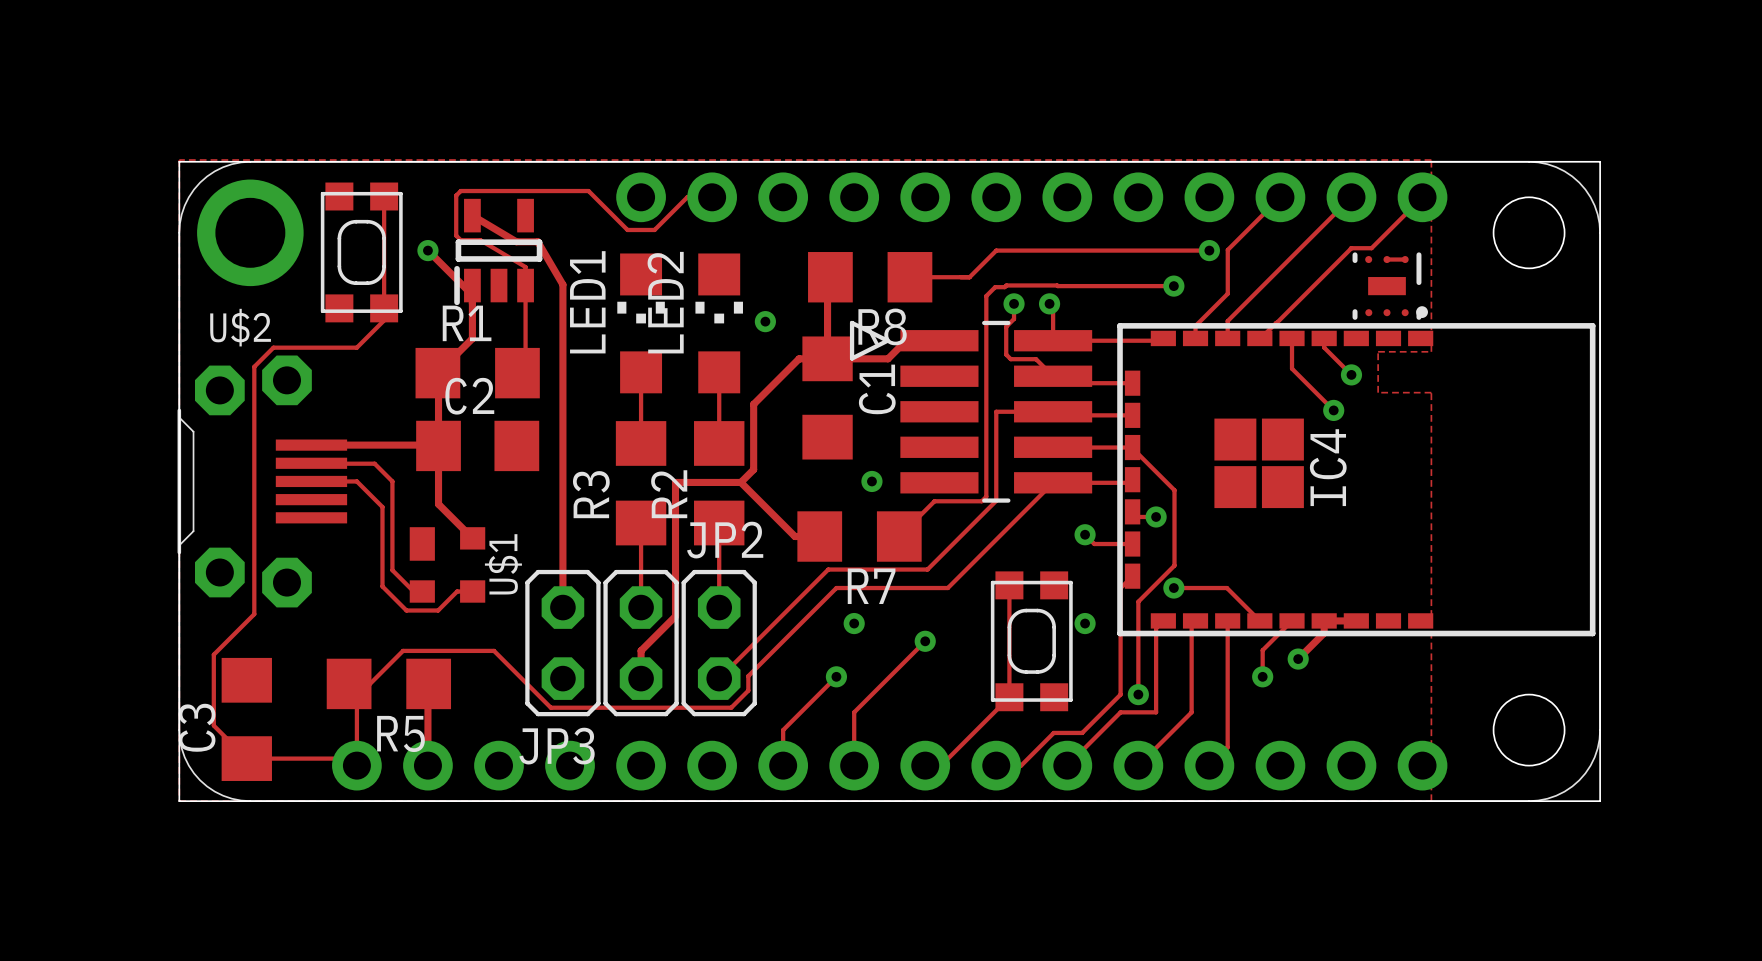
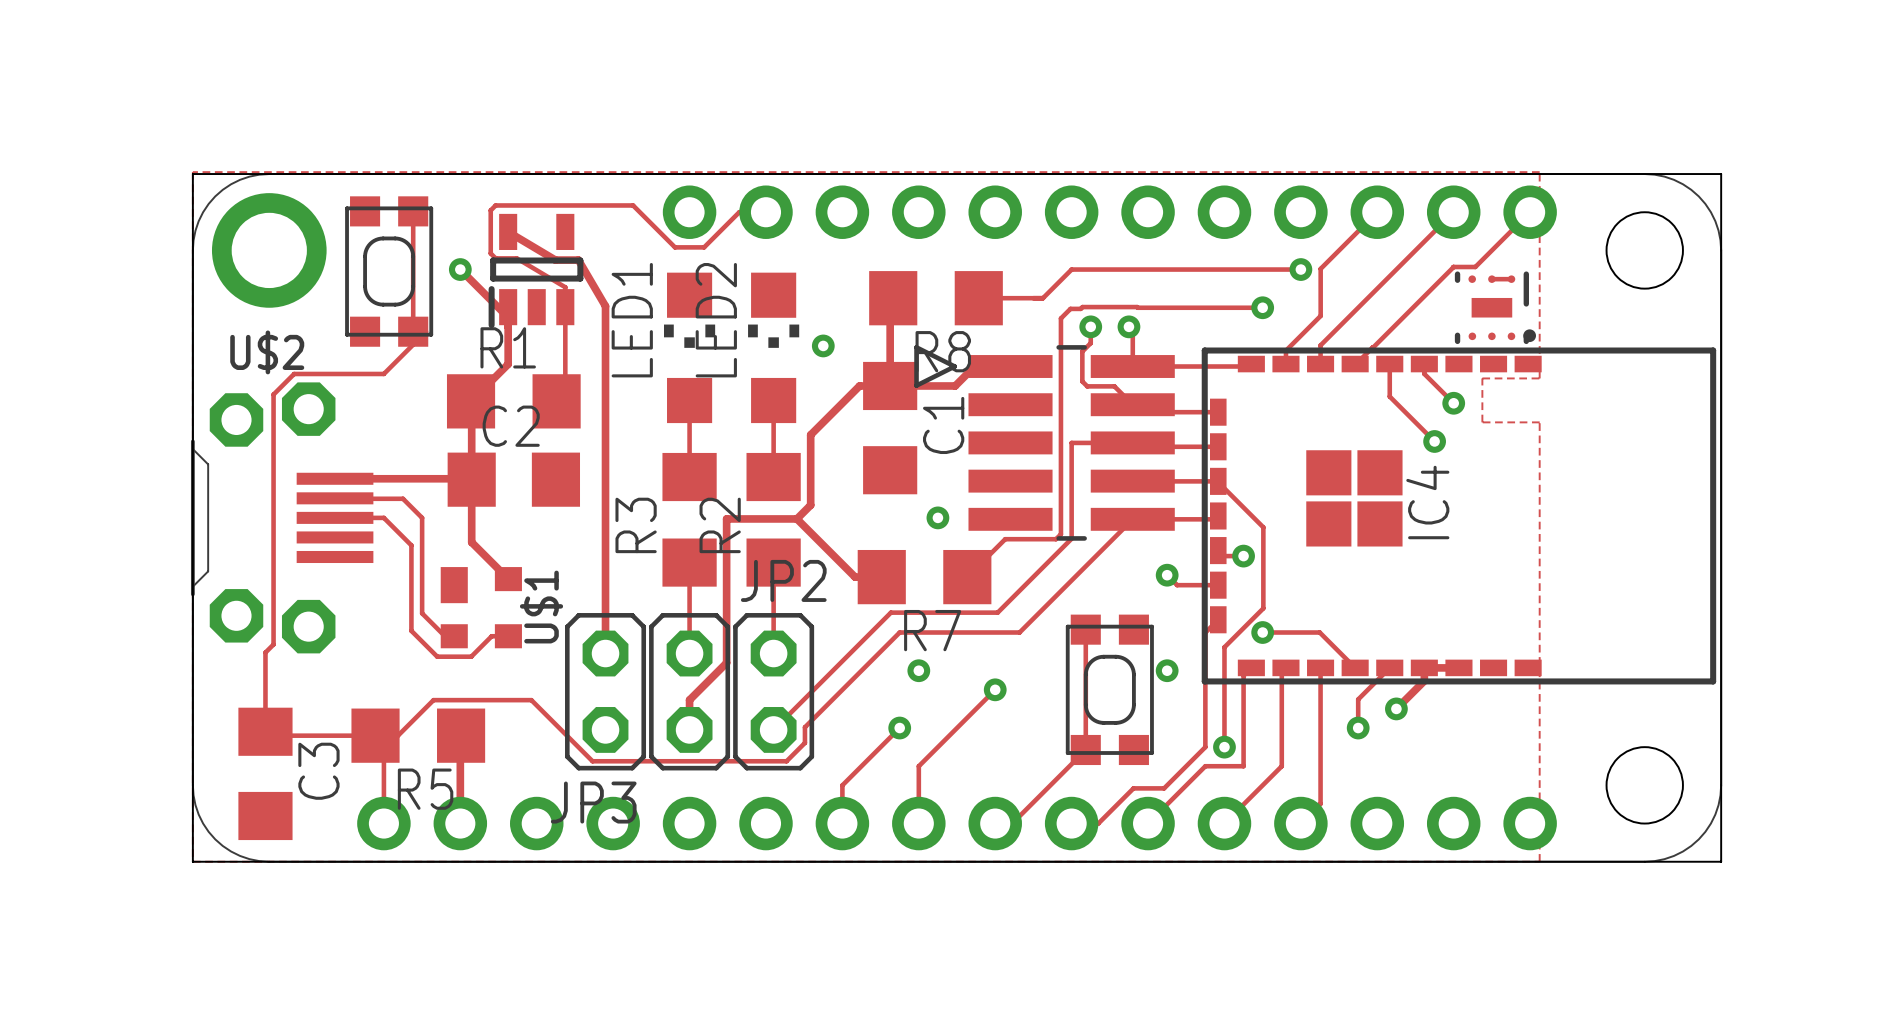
track: (254, 599) (254, 614) (213, 654) (213, 725) (246, 758) (349, 758) (356, 765) -> (273, 644) (265, 652) (265, 731) (269, 728)
track: none -> (269, 728) (276, 735) (364, 735)
C3 name position: C3 (197, 727) -> C3 (318, 771)

